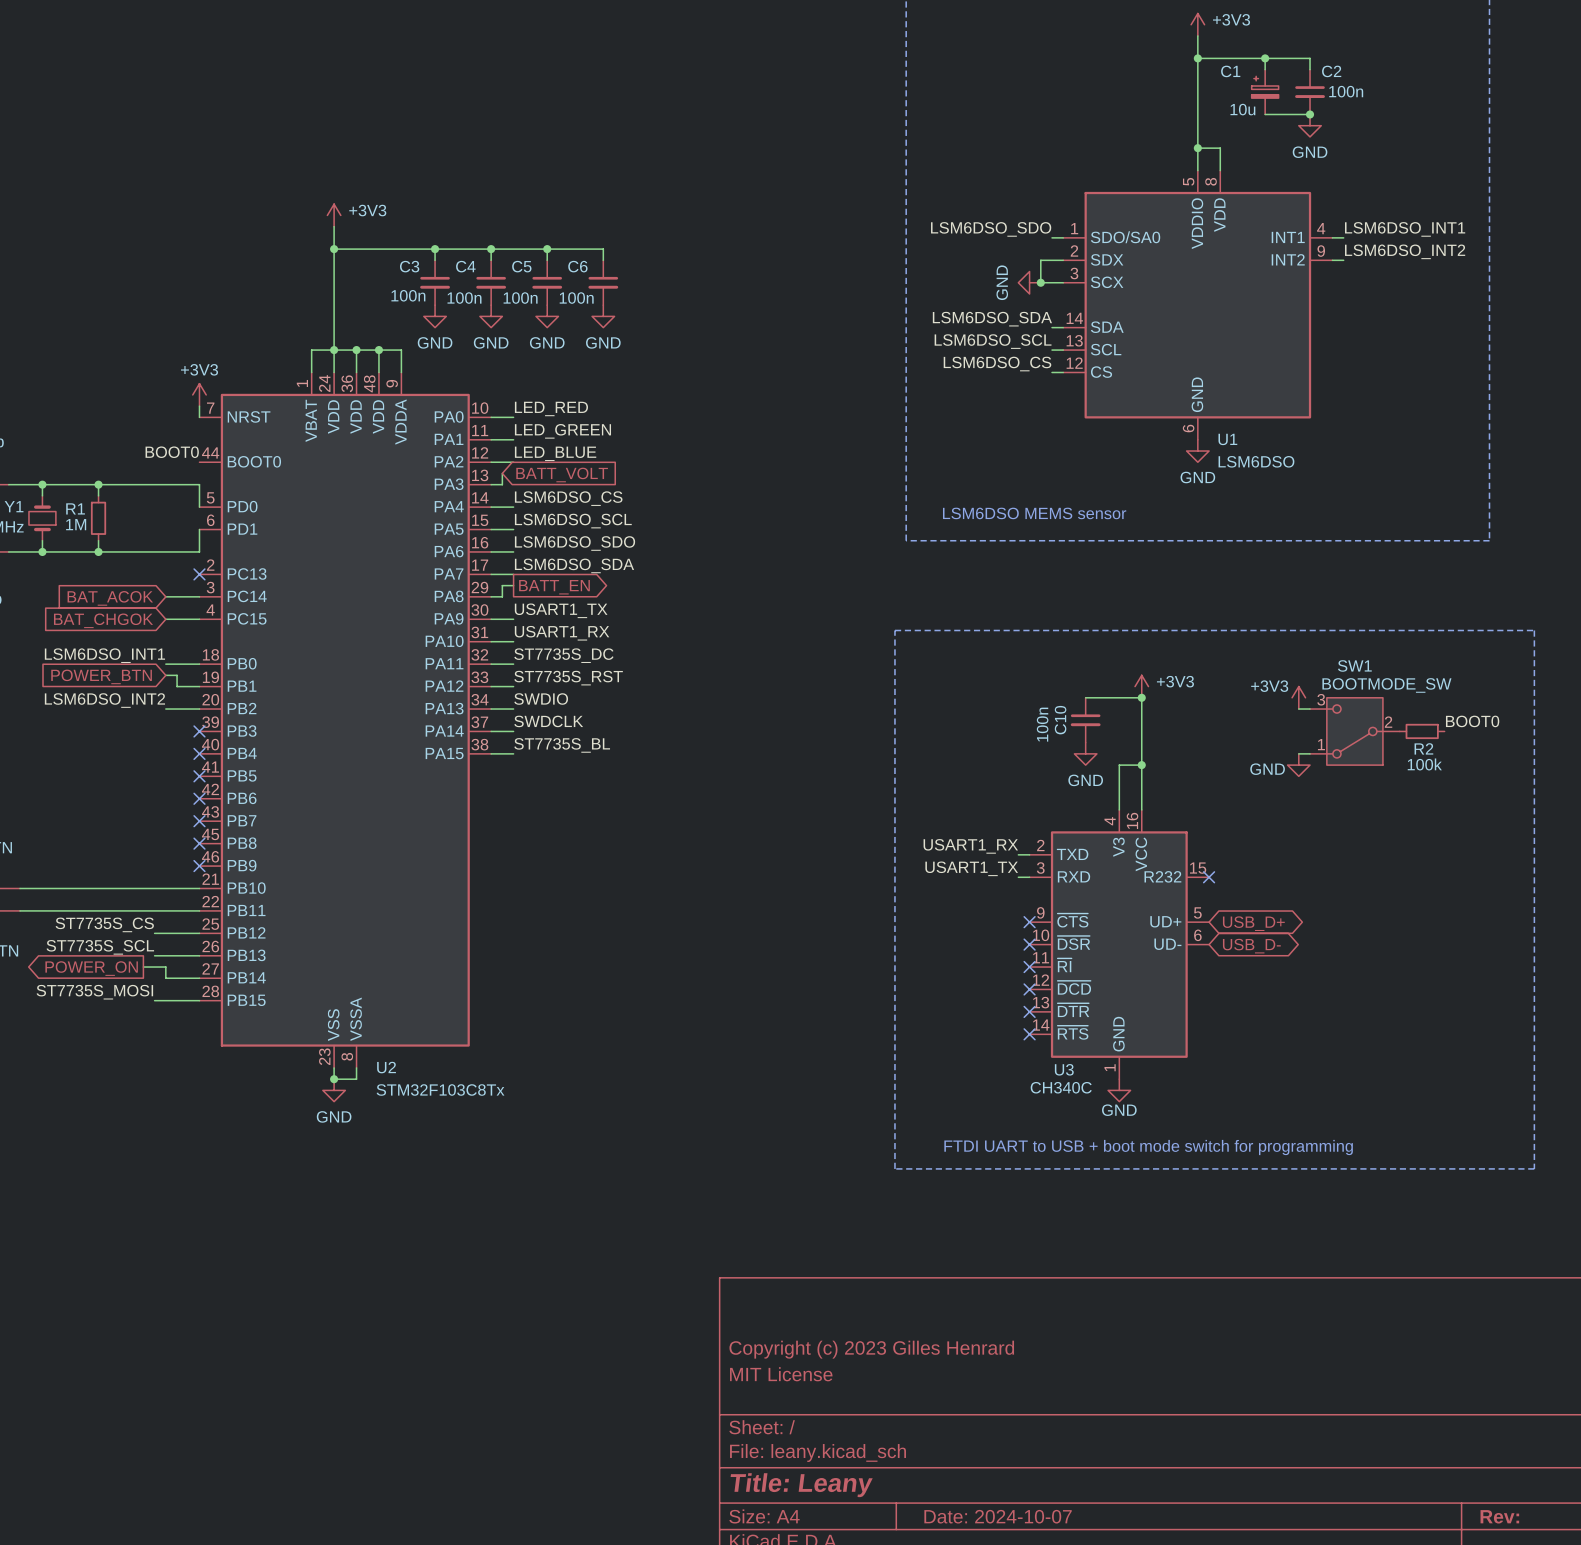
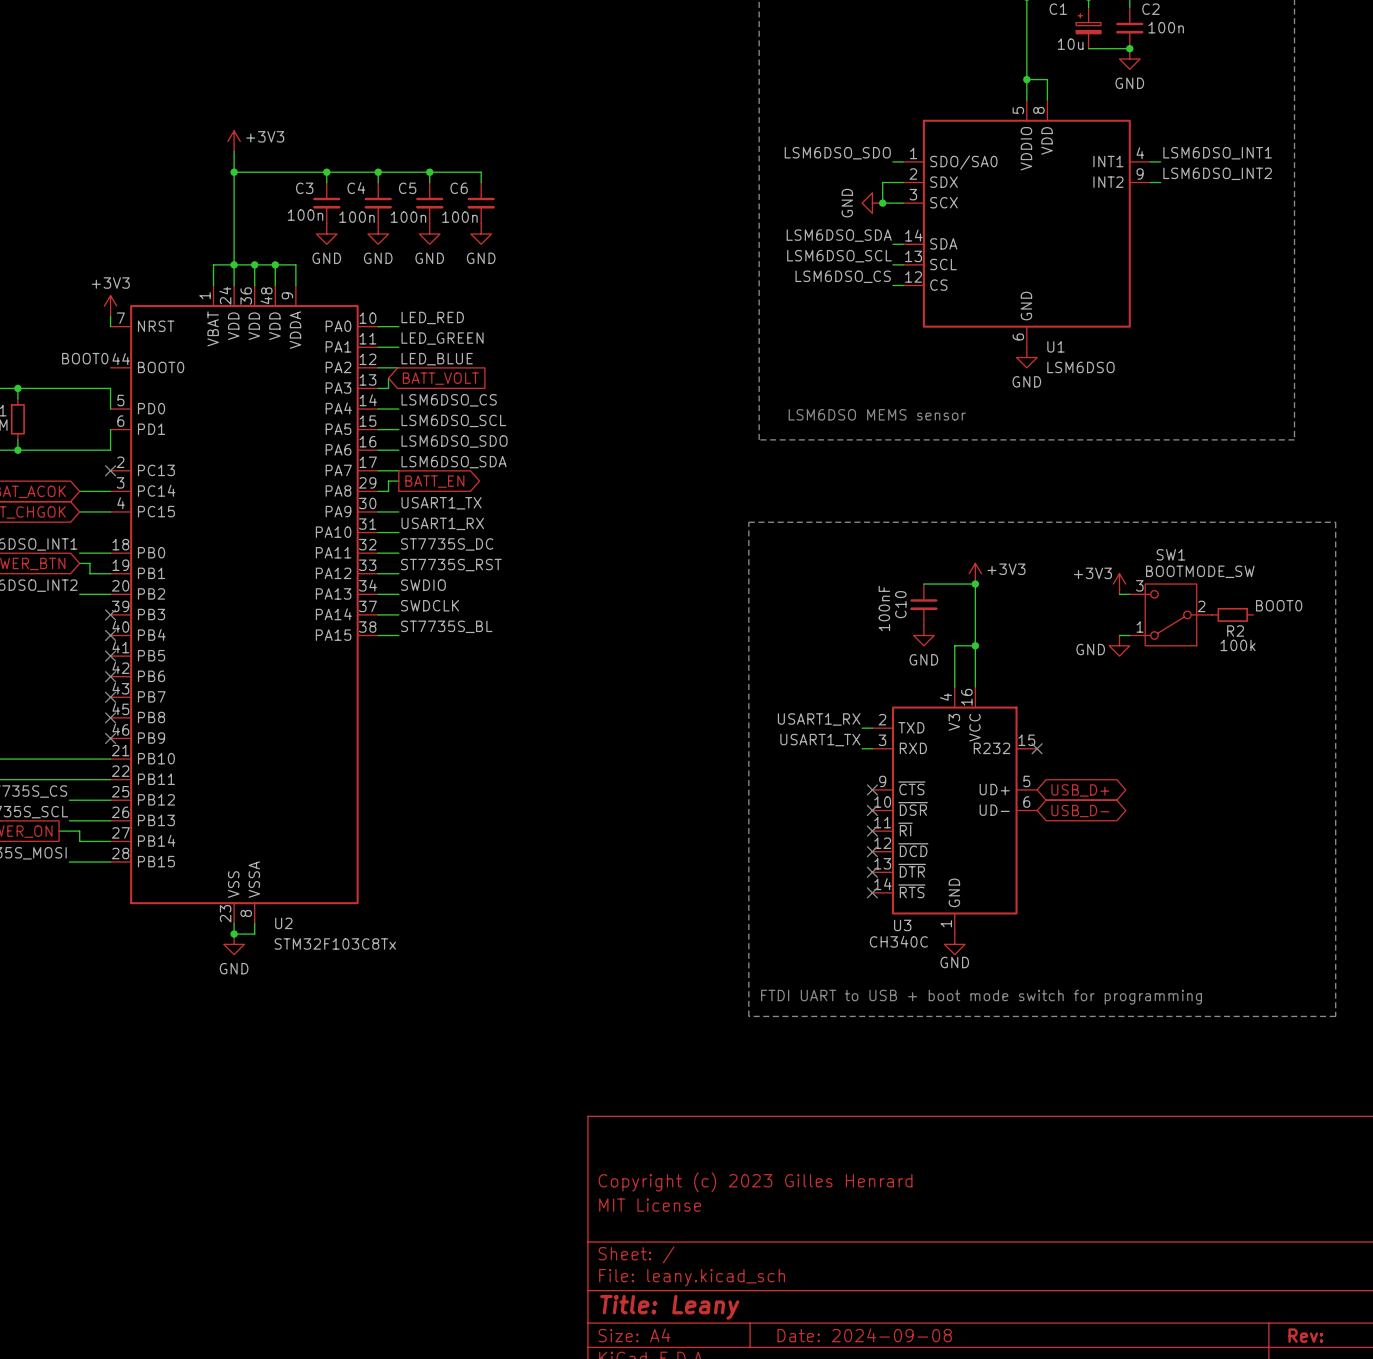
C10 value: 100n (1042, 724) -> 100nF (884, 608)
title block: Date: 2024-10-07 (998, 1516) -> Date: 2024-09-08 (864, 1335)

